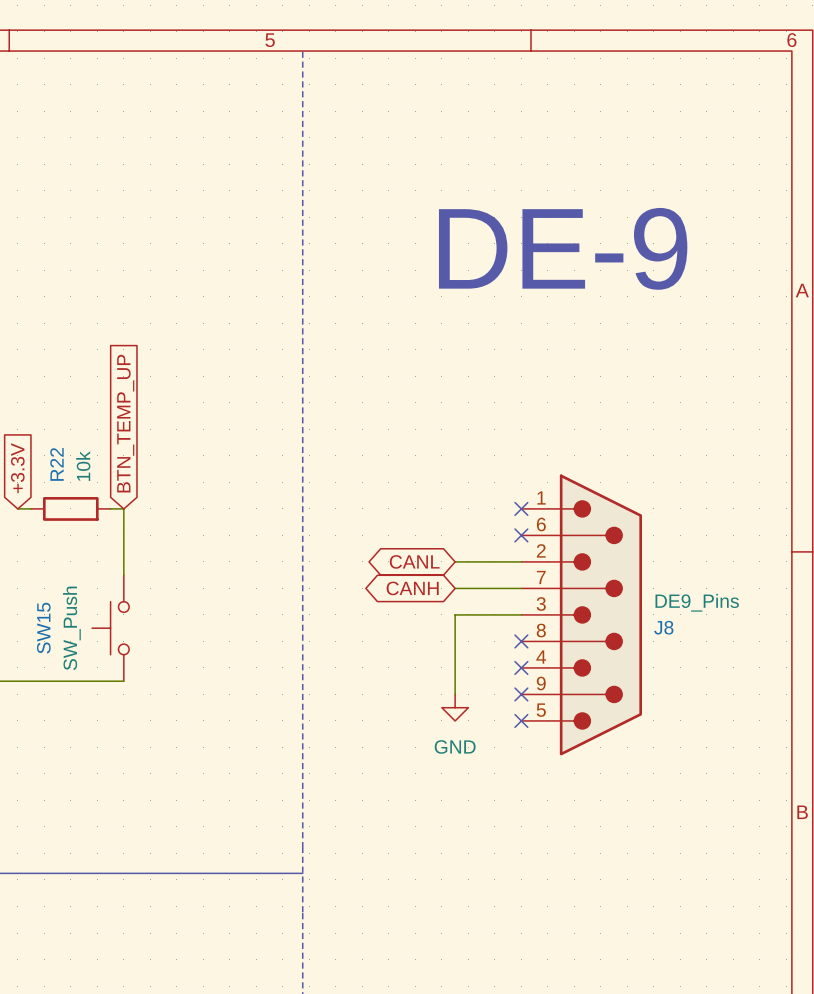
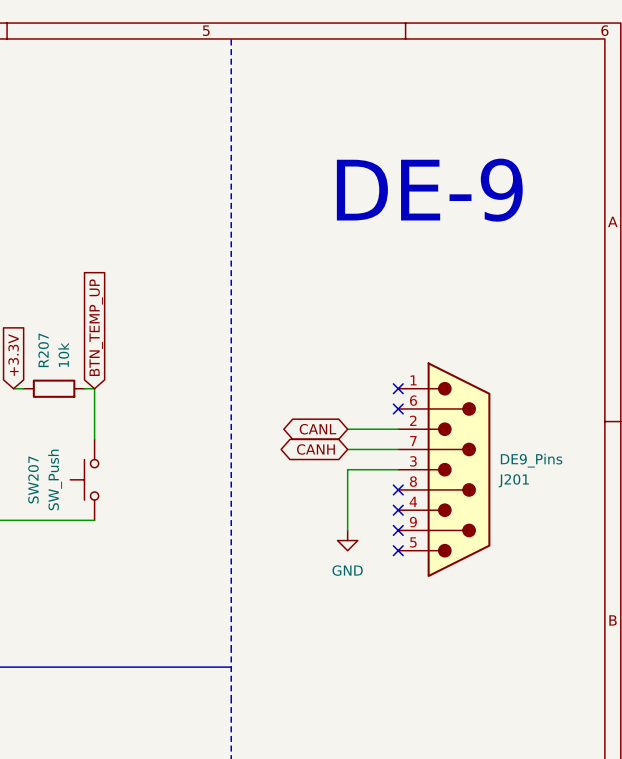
R22 name: R22 (56, 464) -> R207 (43, 350)
J8 name: J8 (663, 627) -> J201 (513, 480)
SW15 name: SW15 (43, 628) -> SW207 (33, 479)

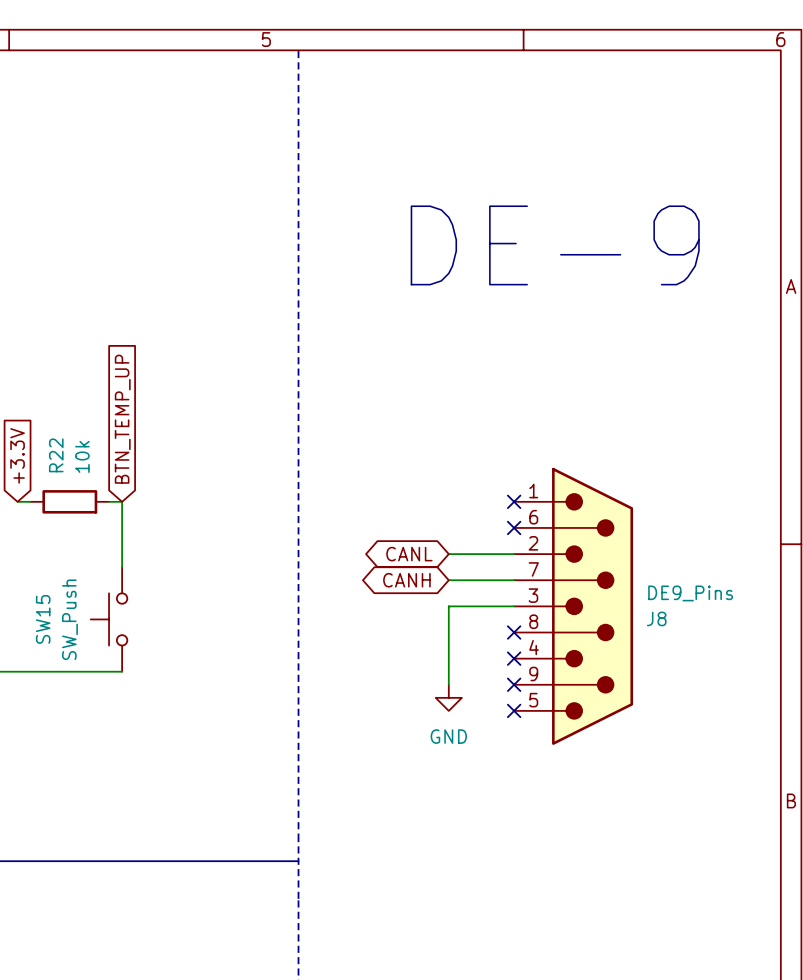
R207 name: R207 (43, 350) -> R22 (56, 455)
SW207 name: SW207 (33, 479) -> SW15 (43, 619)
J201 name: J201 (513, 480) -> J8 (656, 618)

